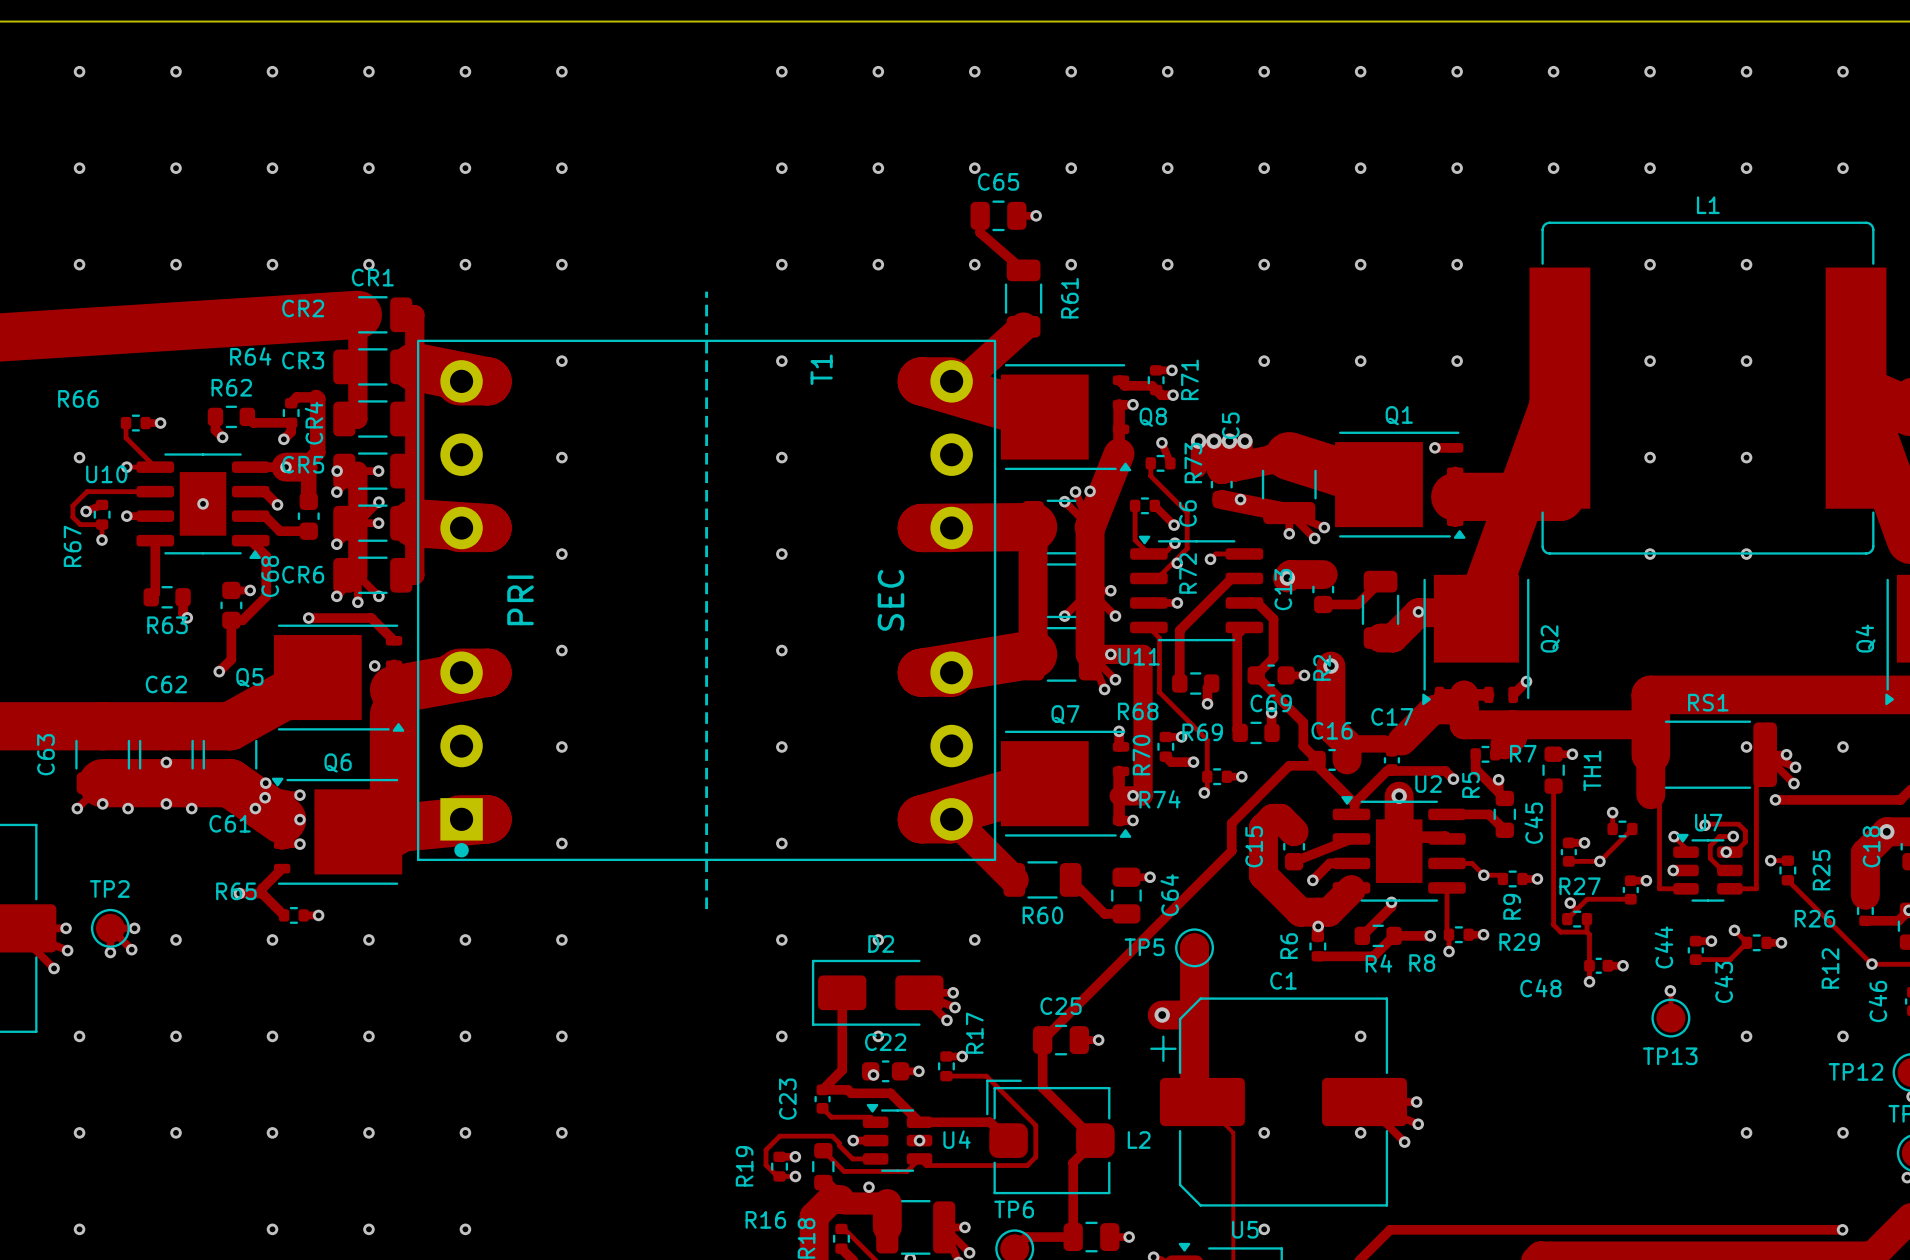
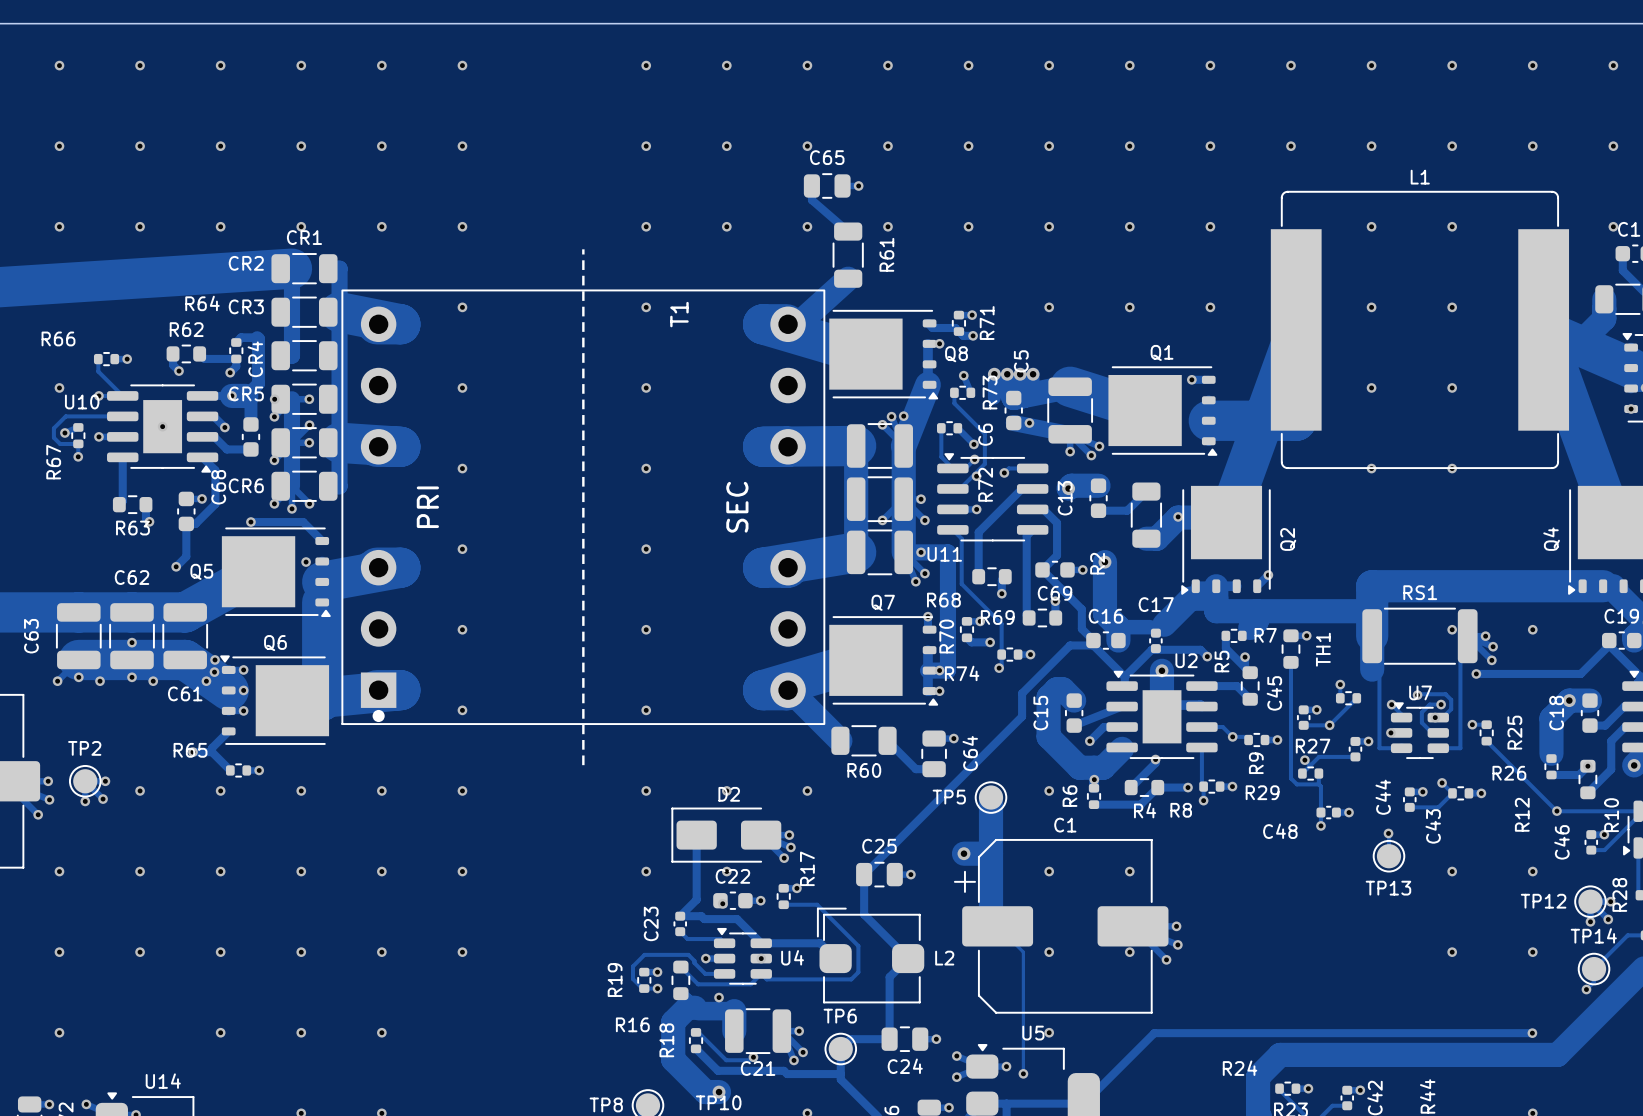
via: none -> (1049, 790)
via: none -> (1049, 871)

